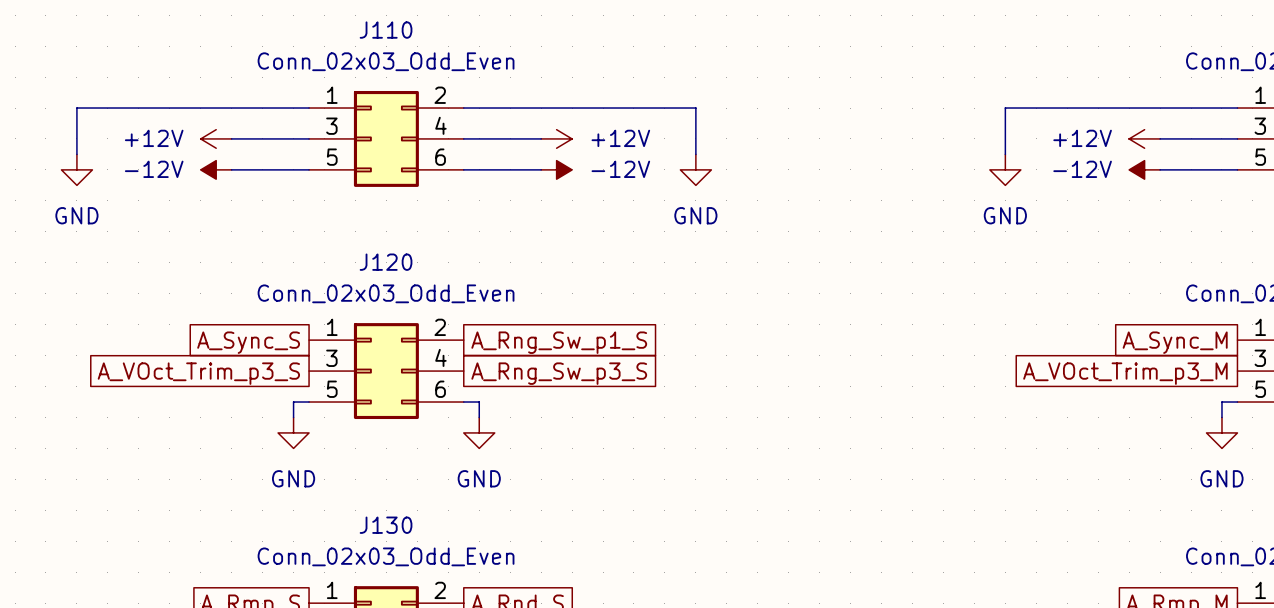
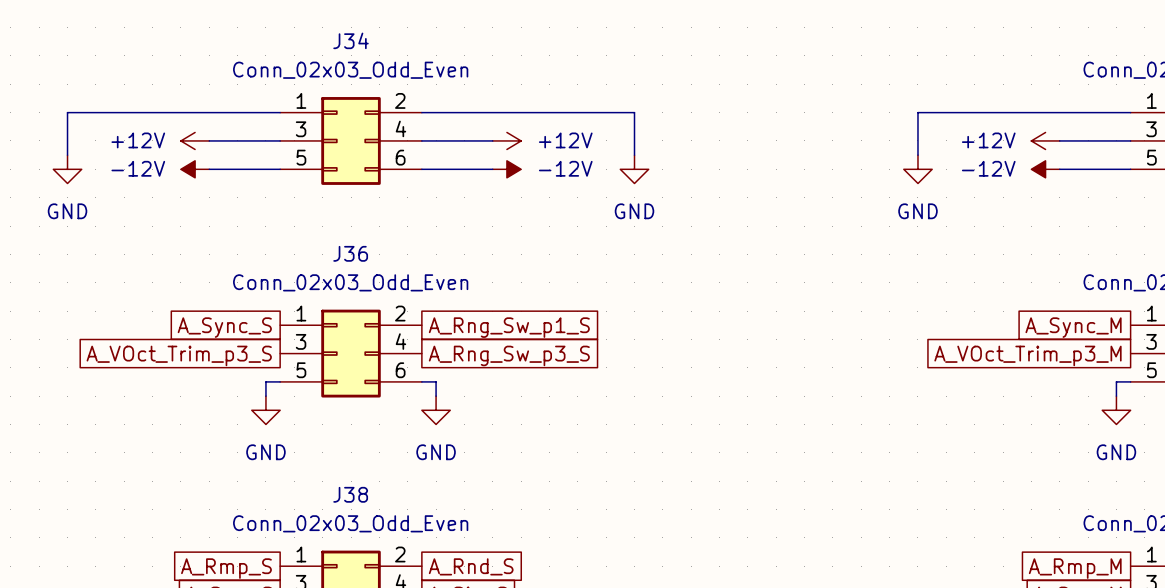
J110 name: J110 (386, 30) -> J34 (351, 40)
J120 name: J120 (386, 262) -> J36 (350, 253)
J130 name: J130 (386, 525) -> J38 (350, 494)

